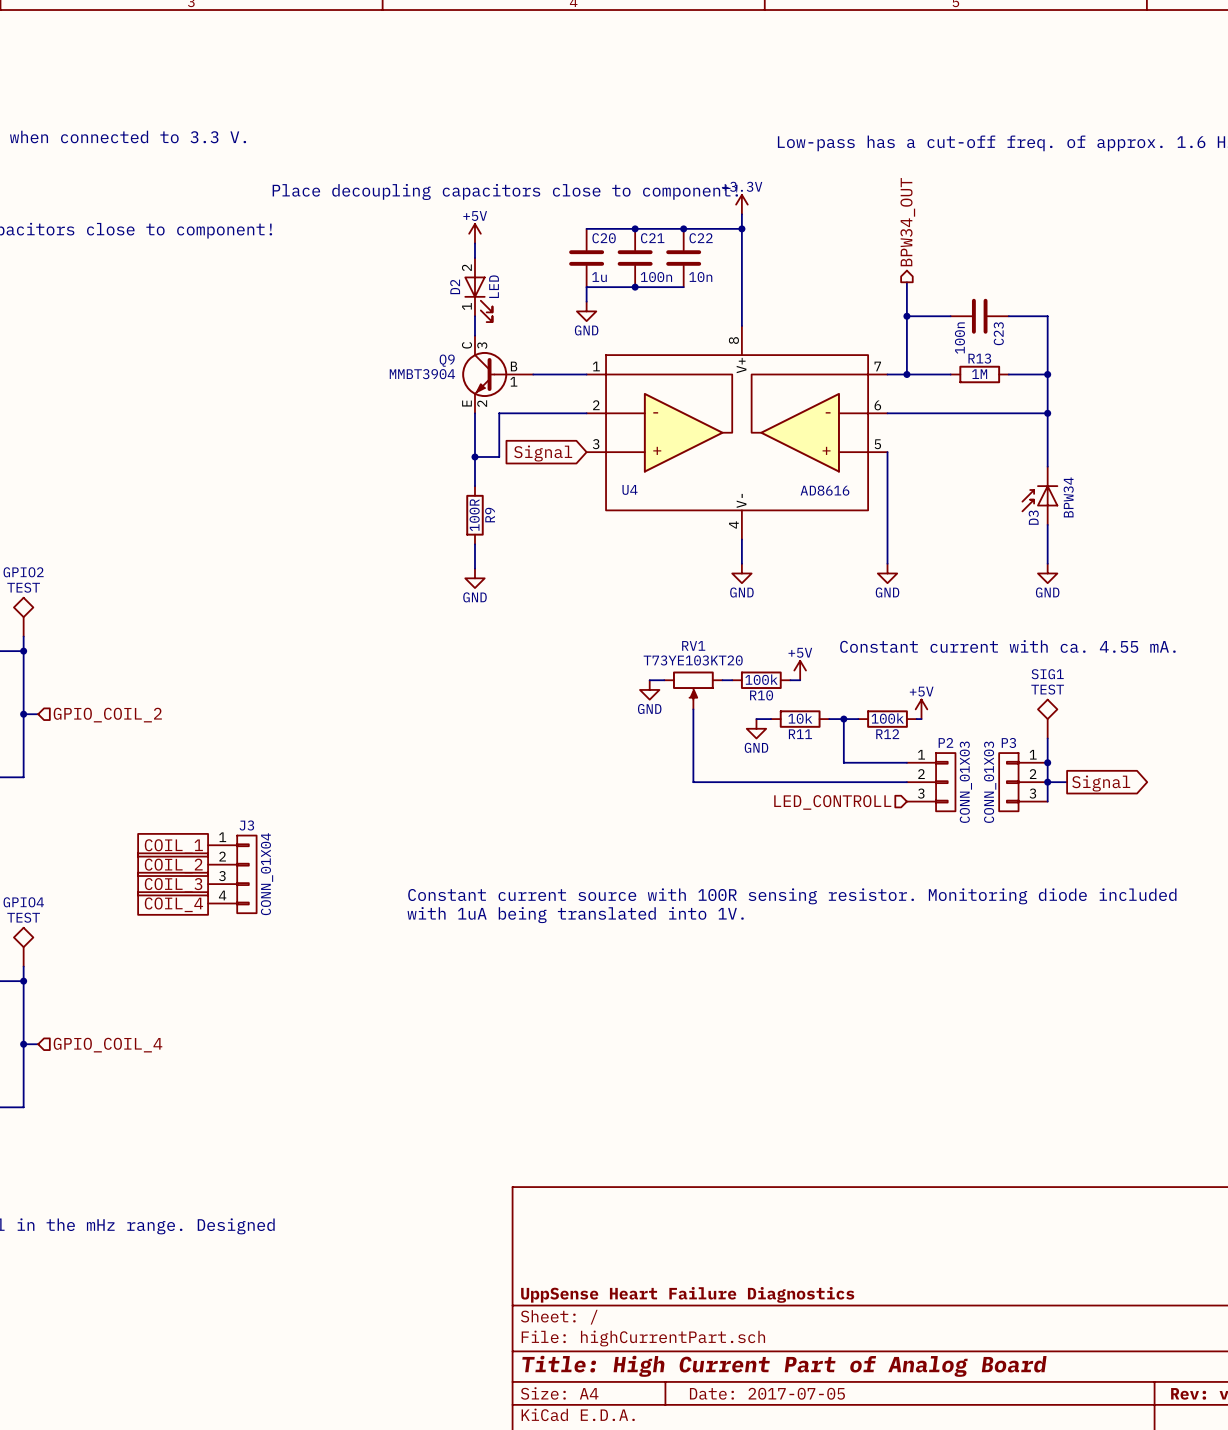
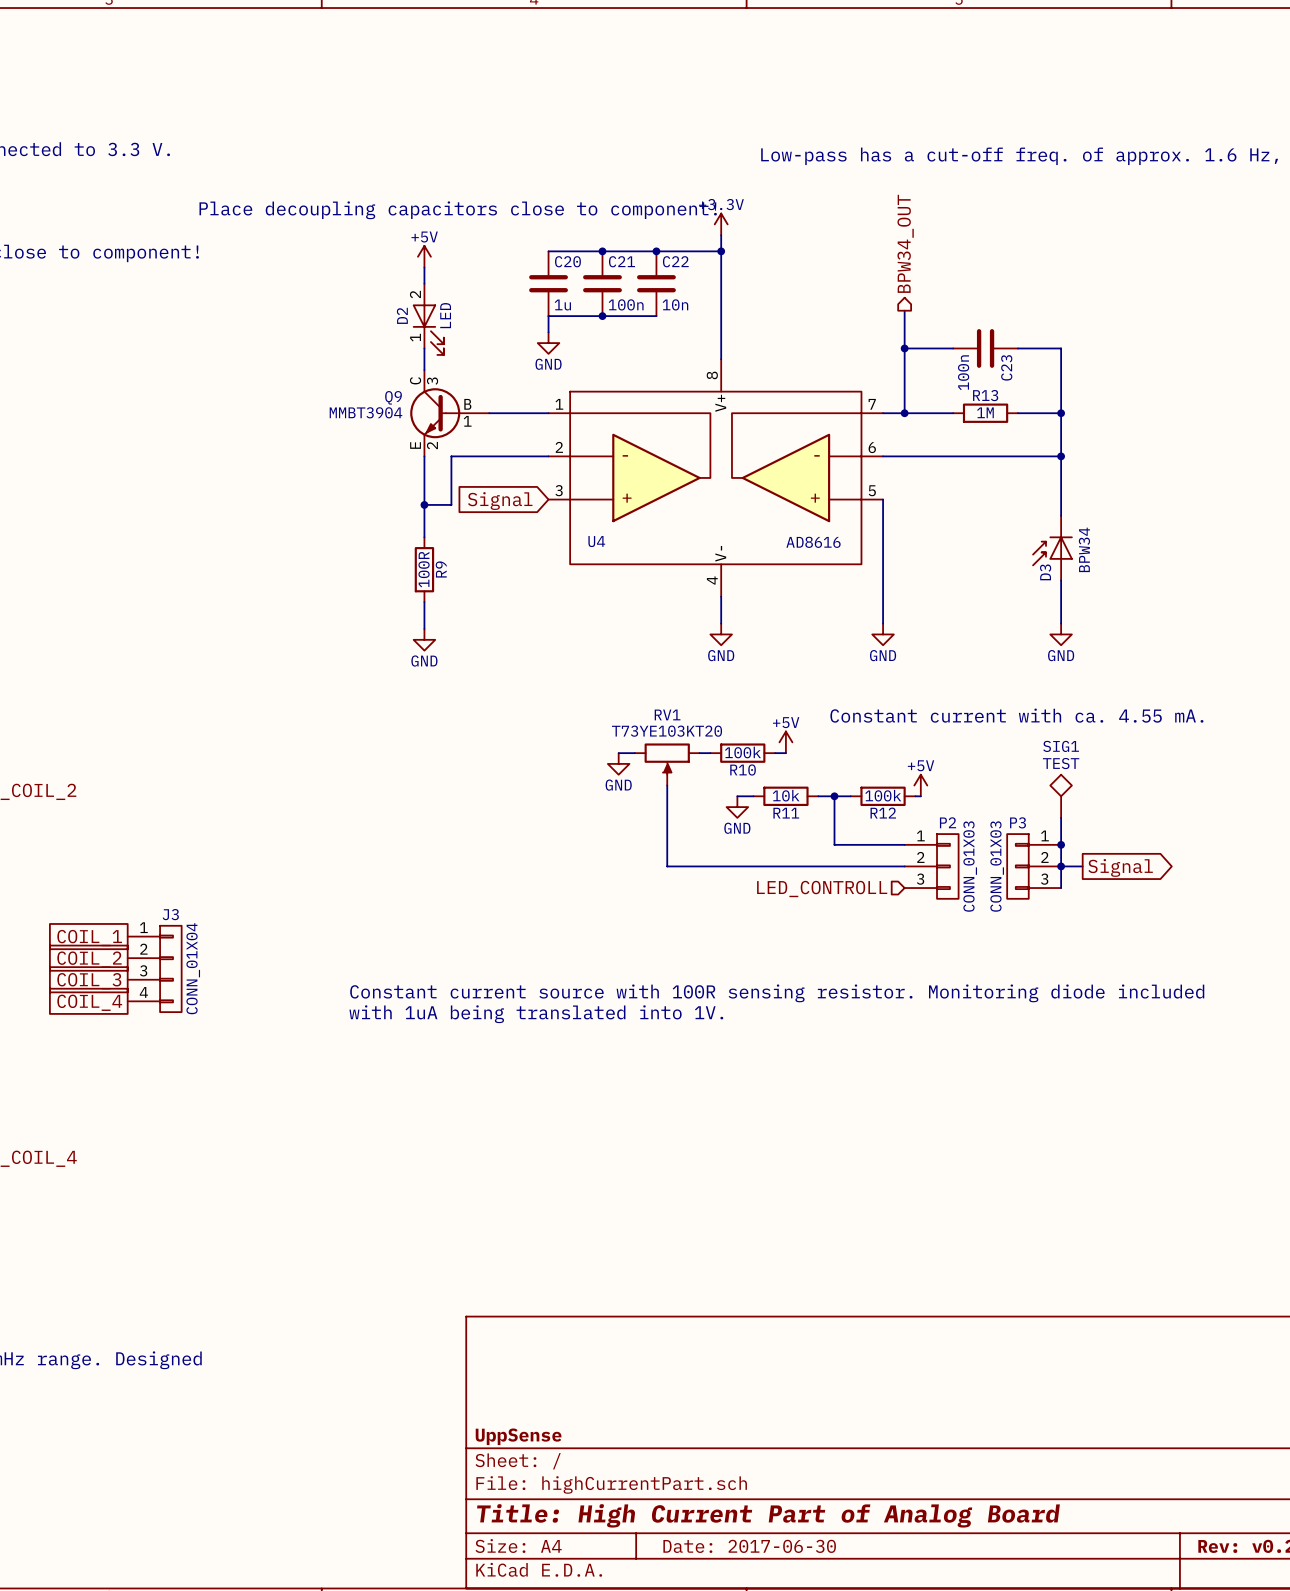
title block: UppSense Heart Failure Diagnostics (687, 1294) -> UppSense (518, 1436)
title block: Date: 2017-07-05 (767, 1393) -> Date: 2017-06-30 (749, 1546)

